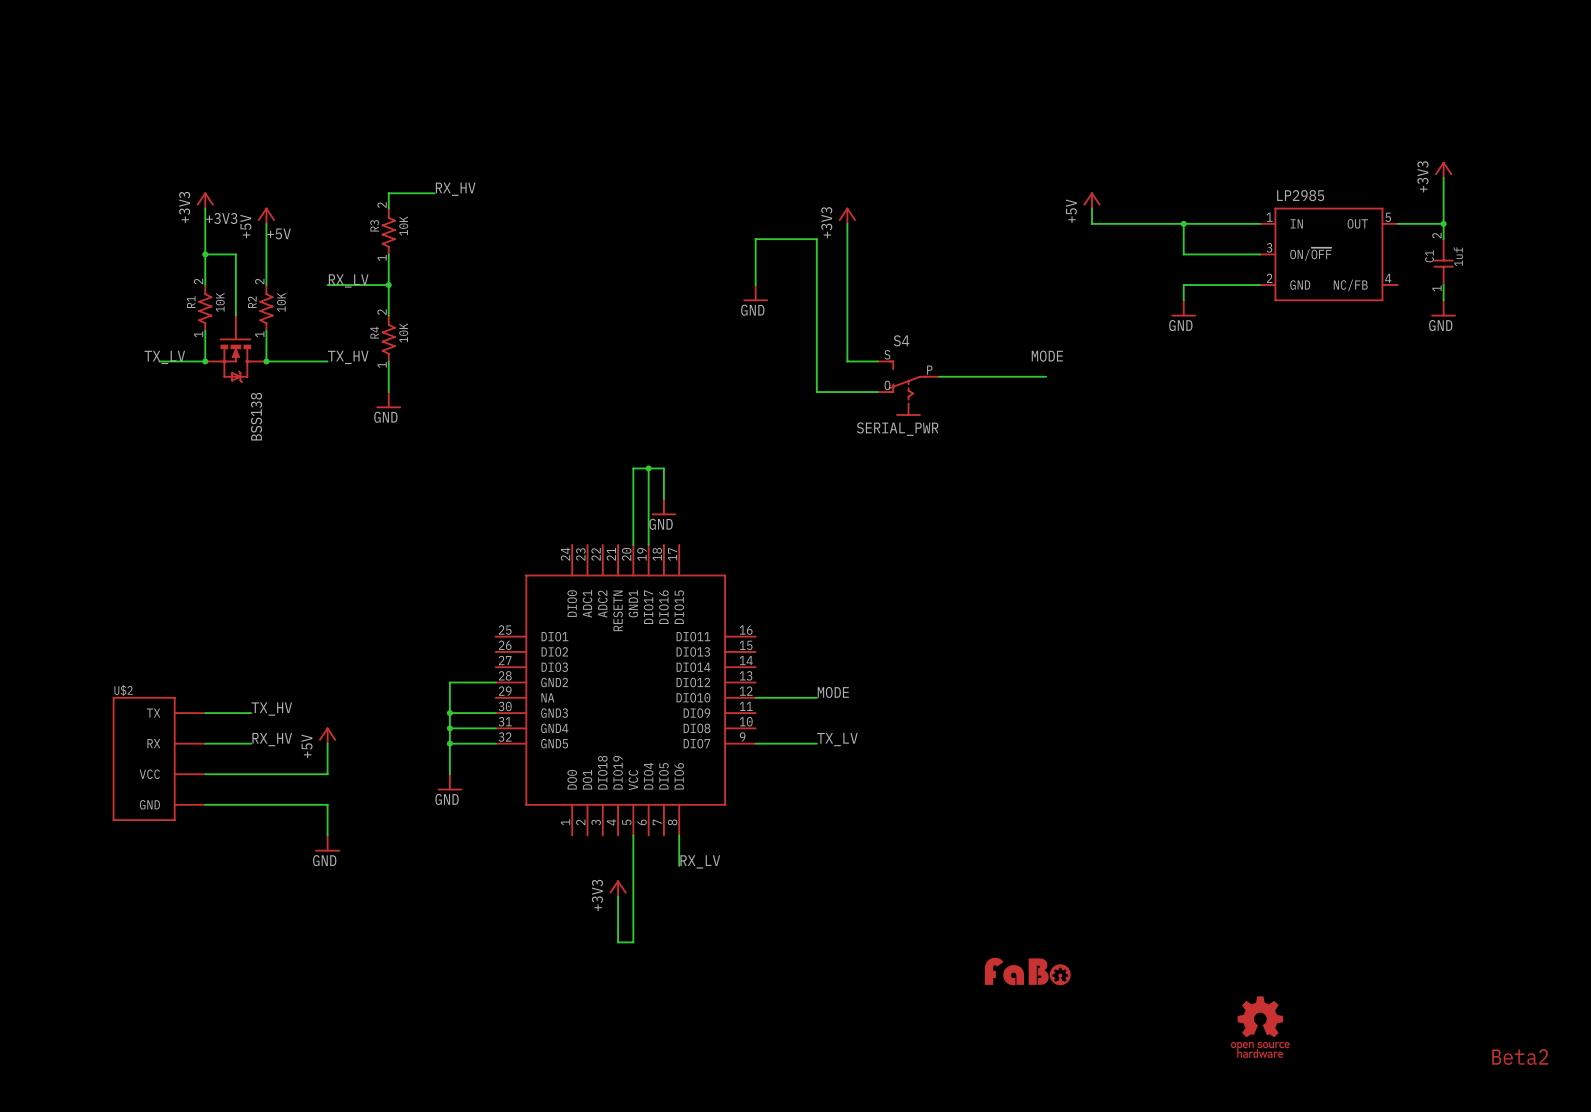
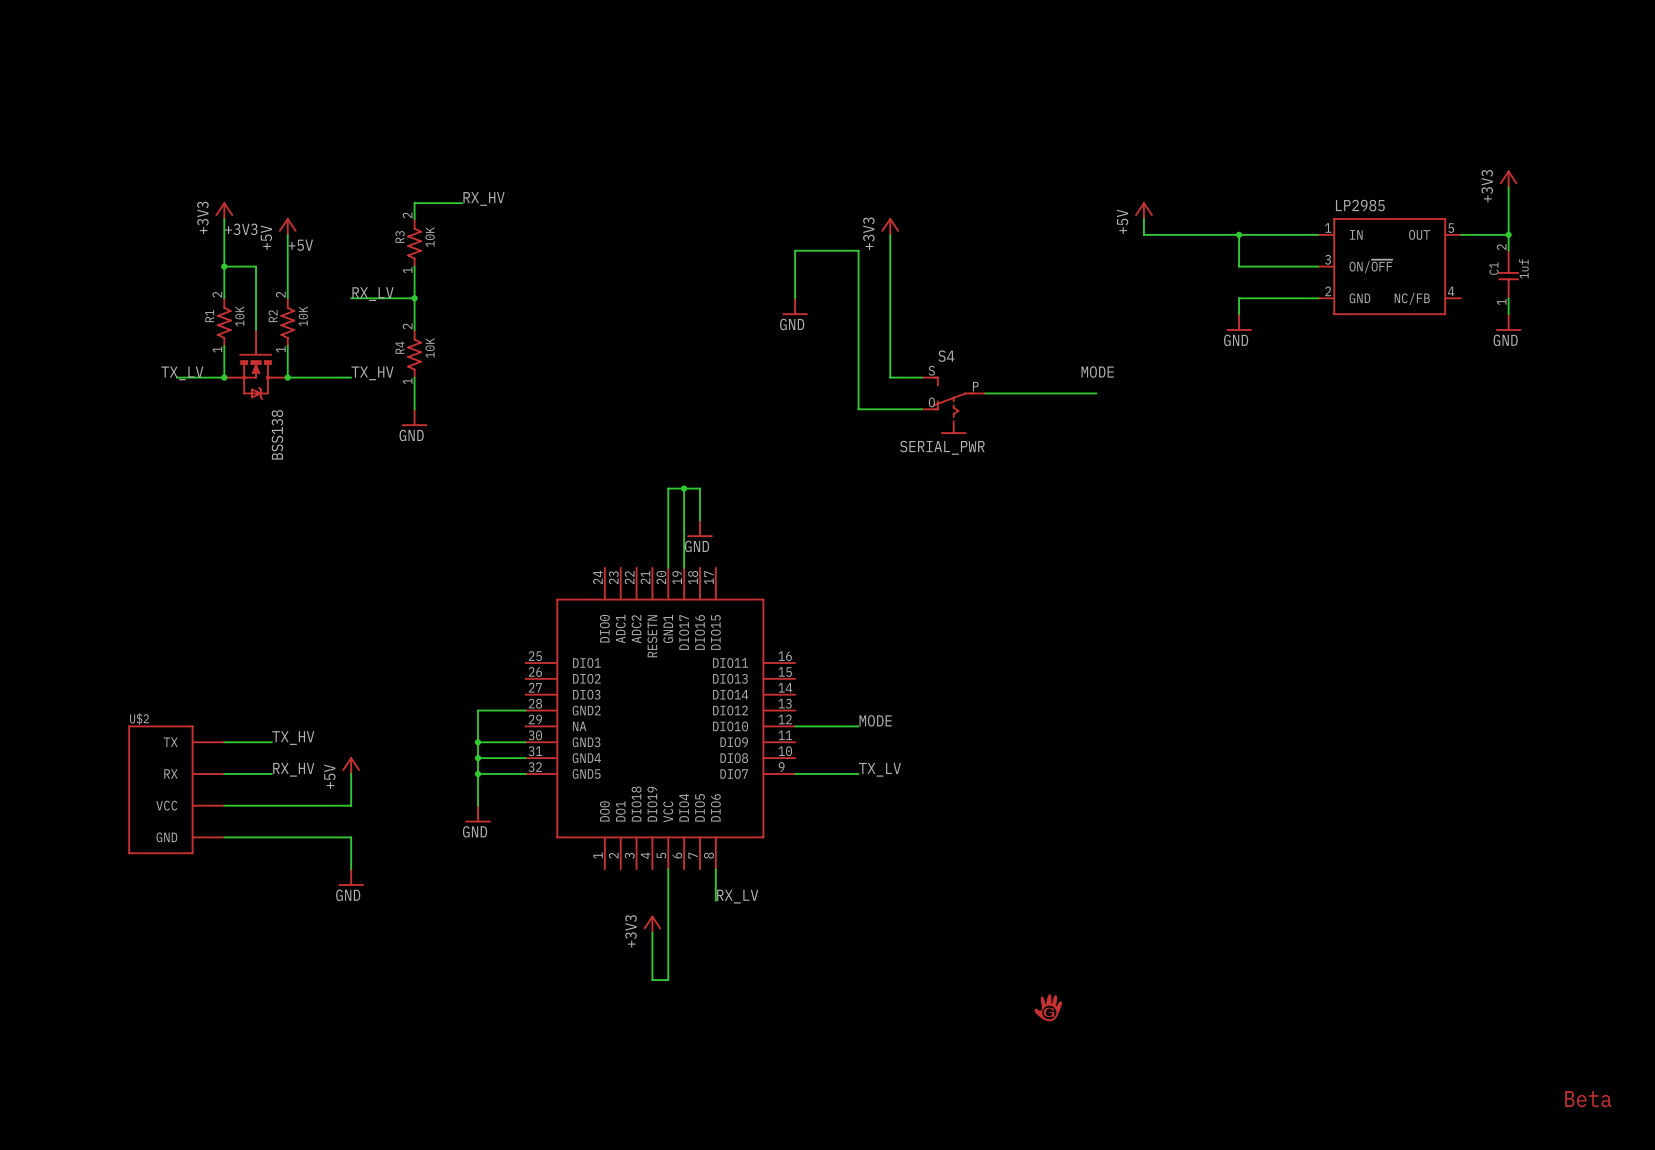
part: none -> (1048, 1007)
part: (1027, 971) -> none
part: (1260, 1027) -> none
text: Beta2 (1520, 1057) -> Beta (1588, 1099)

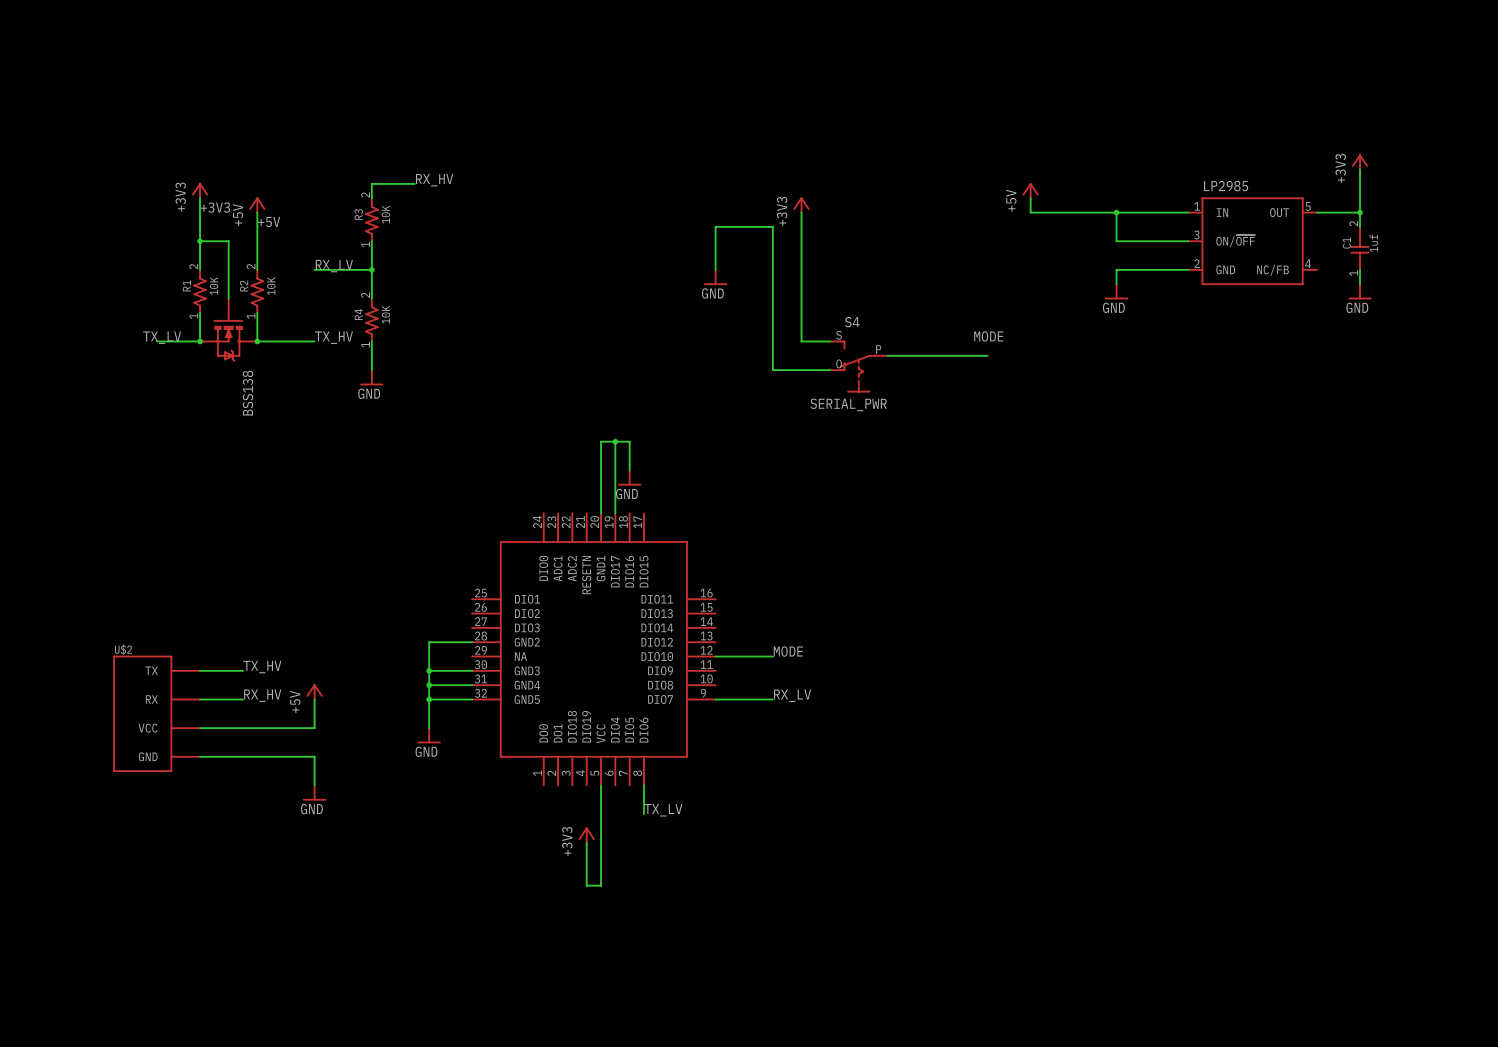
label: TX_LV (879, 769) -> RX_LV (792, 695)
label: RX_LV (737, 896) -> TX_LV (663, 810)
part: (1048, 1007) -> none
text: Beta (1588, 1099) -> none

